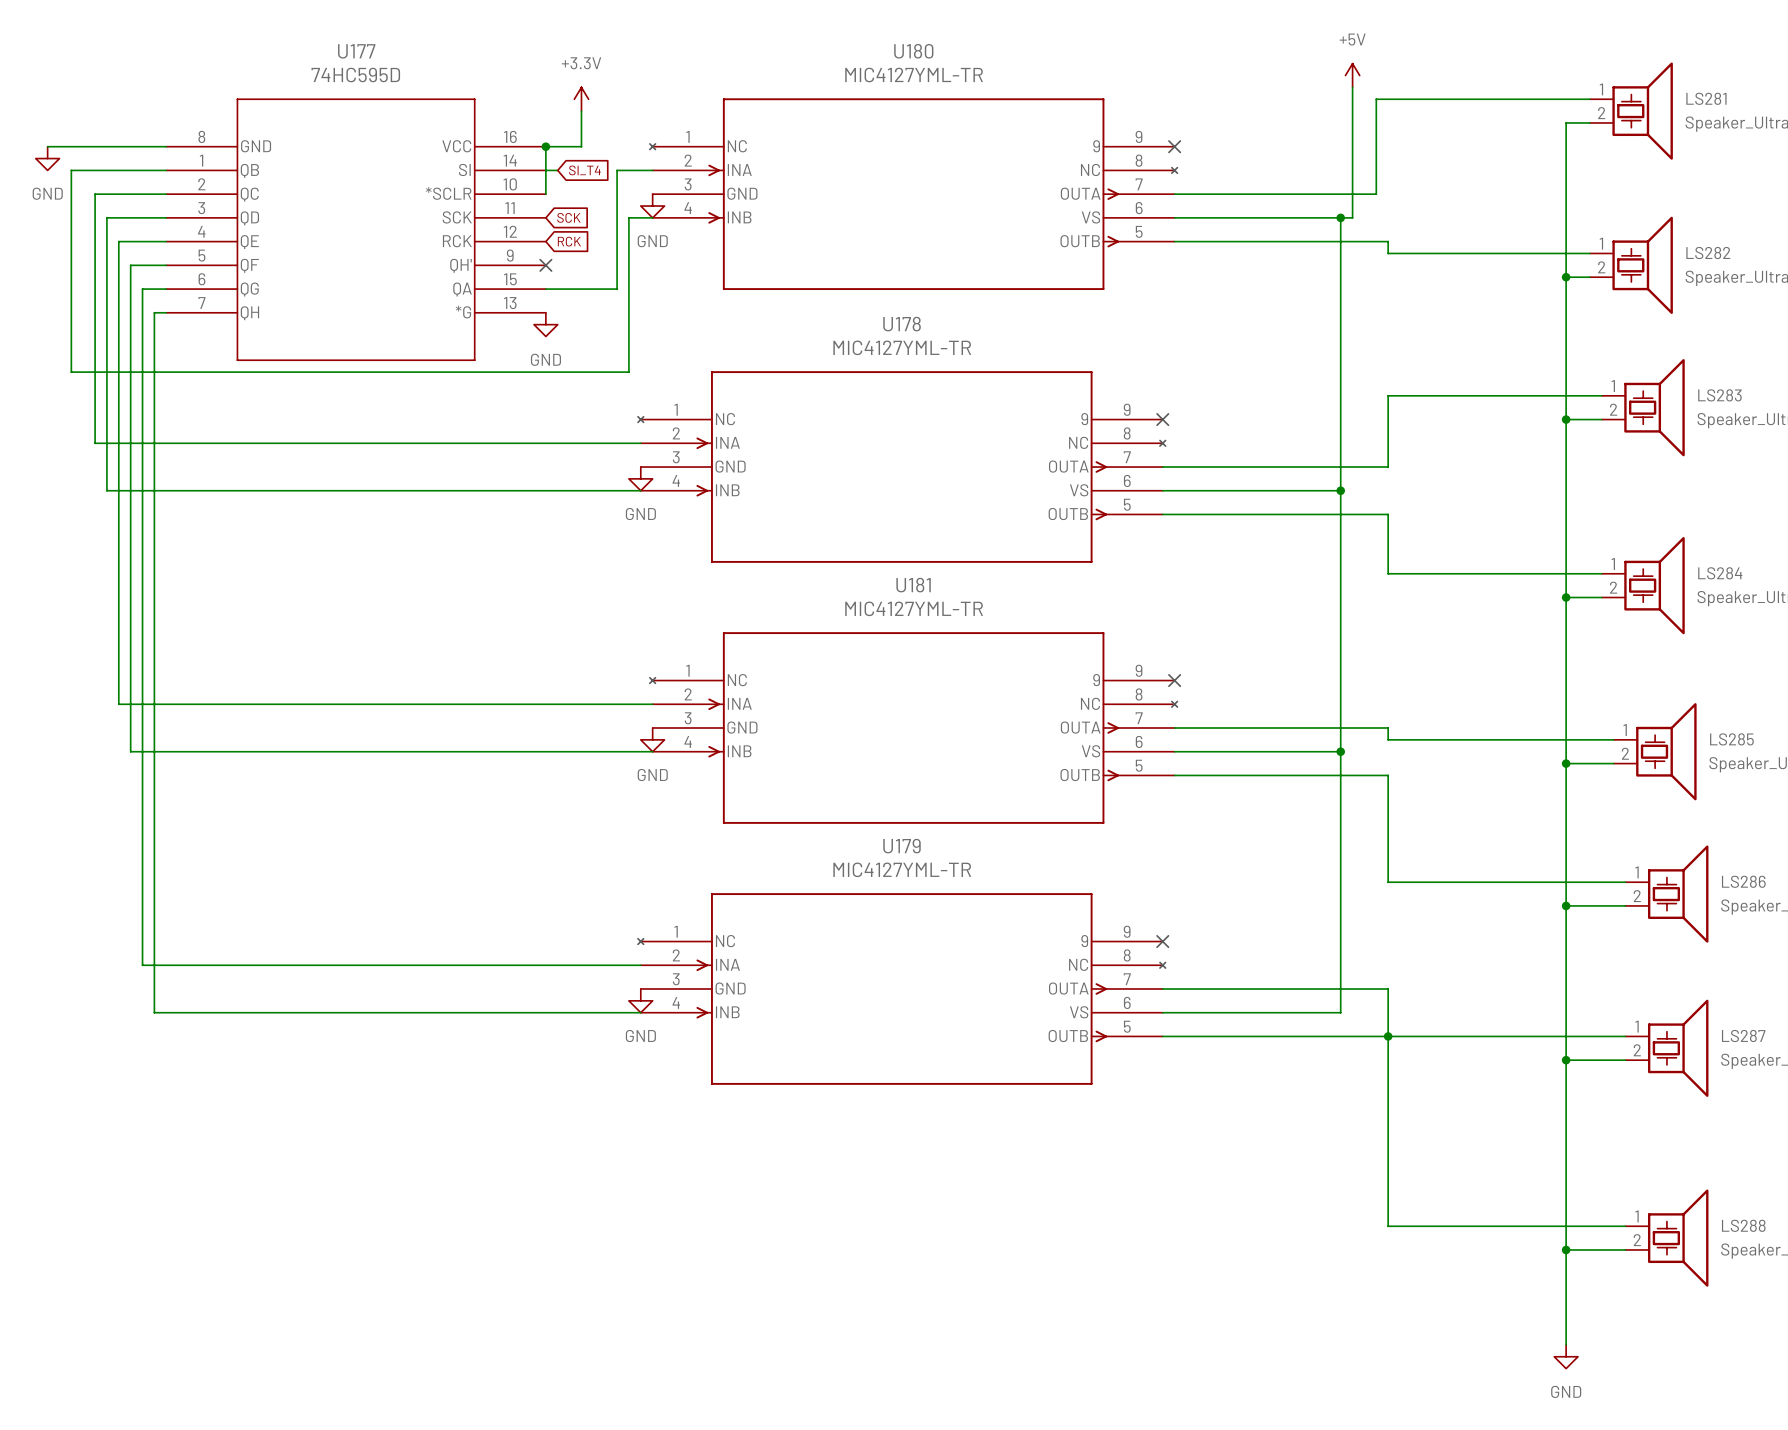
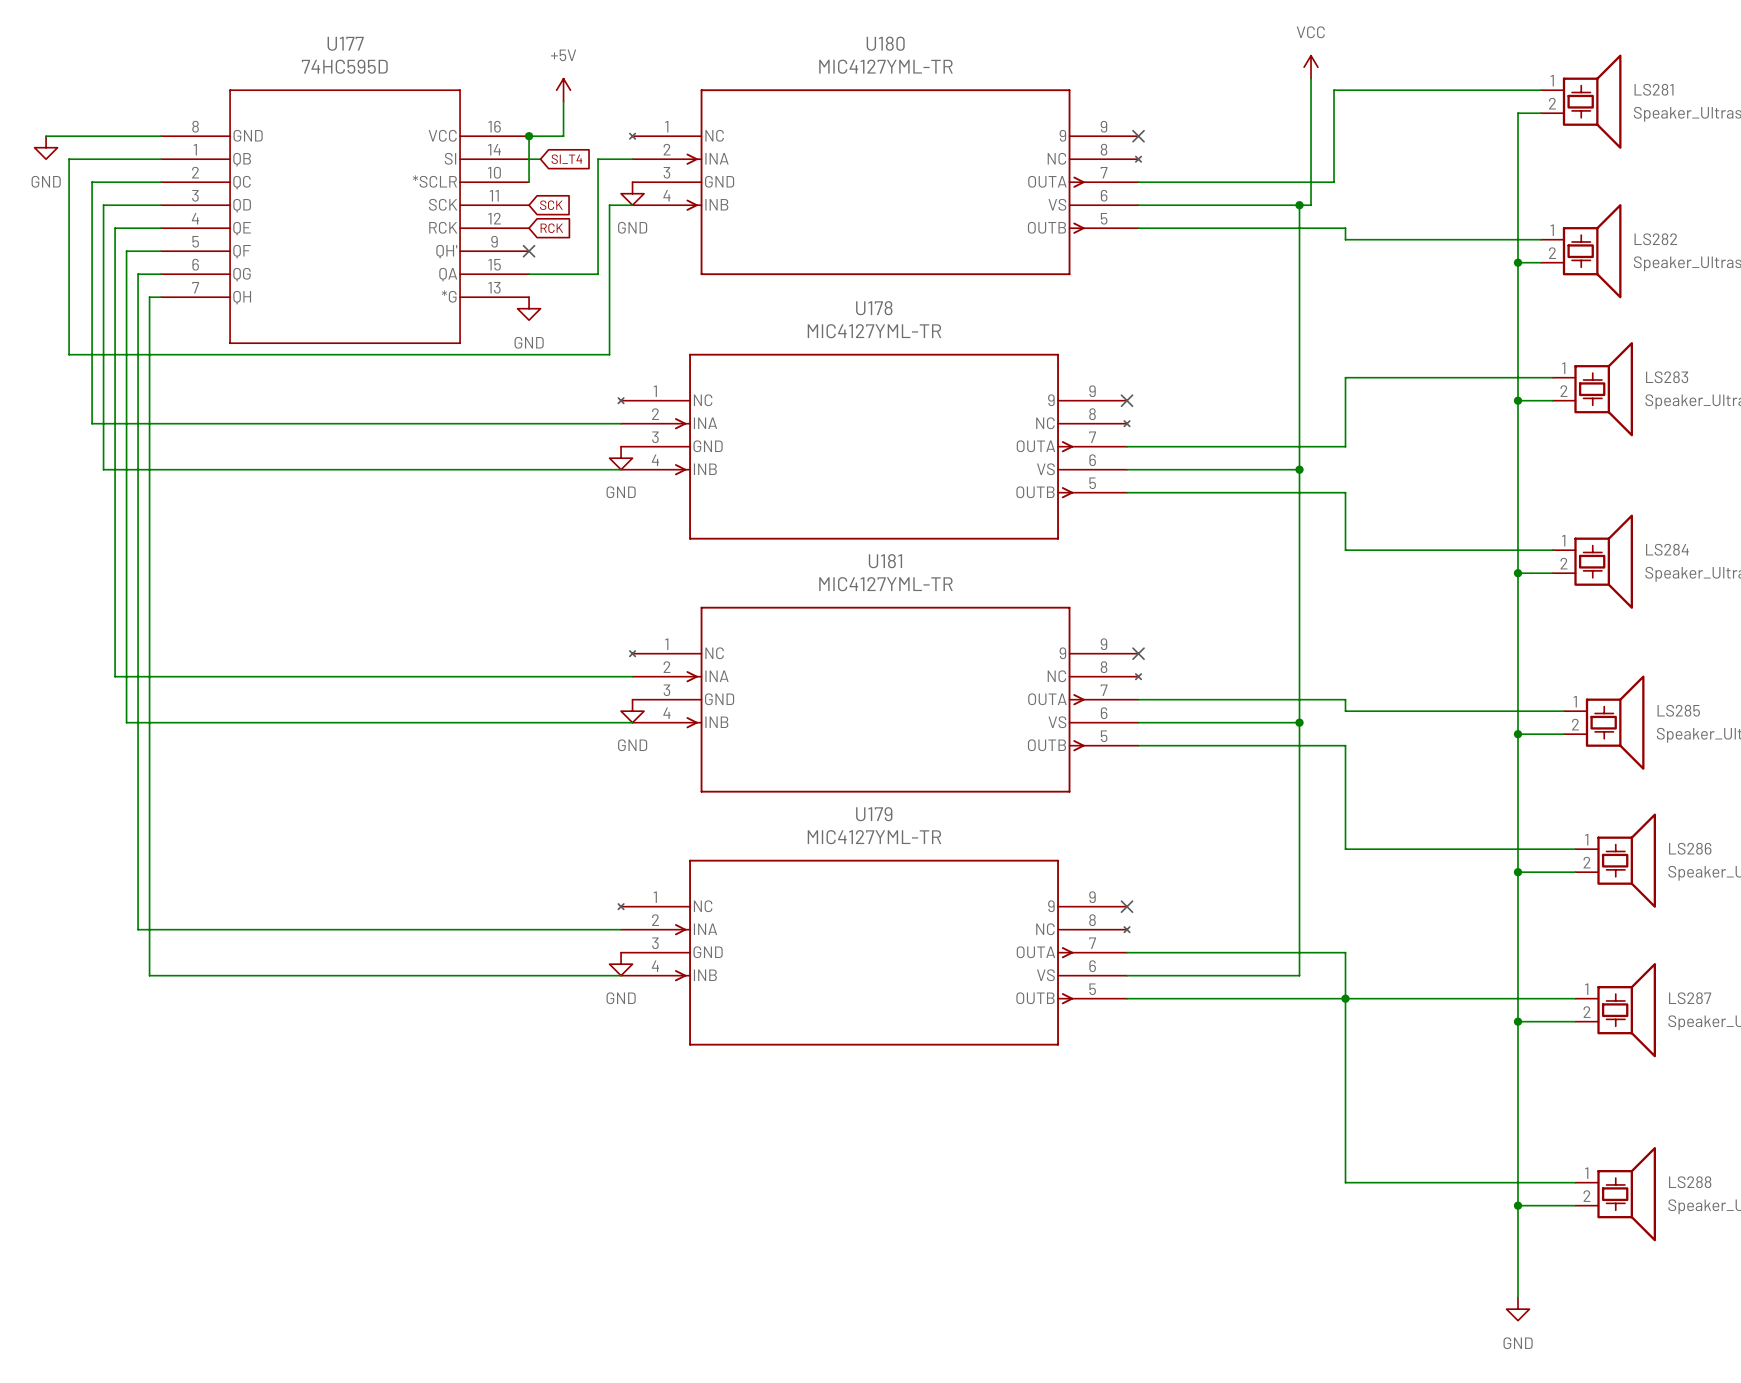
power symbol: +5V (1352, 75) -> VCC (1311, 67)
power symbol: +3.3V (581, 99) -> +5V (563, 90)

